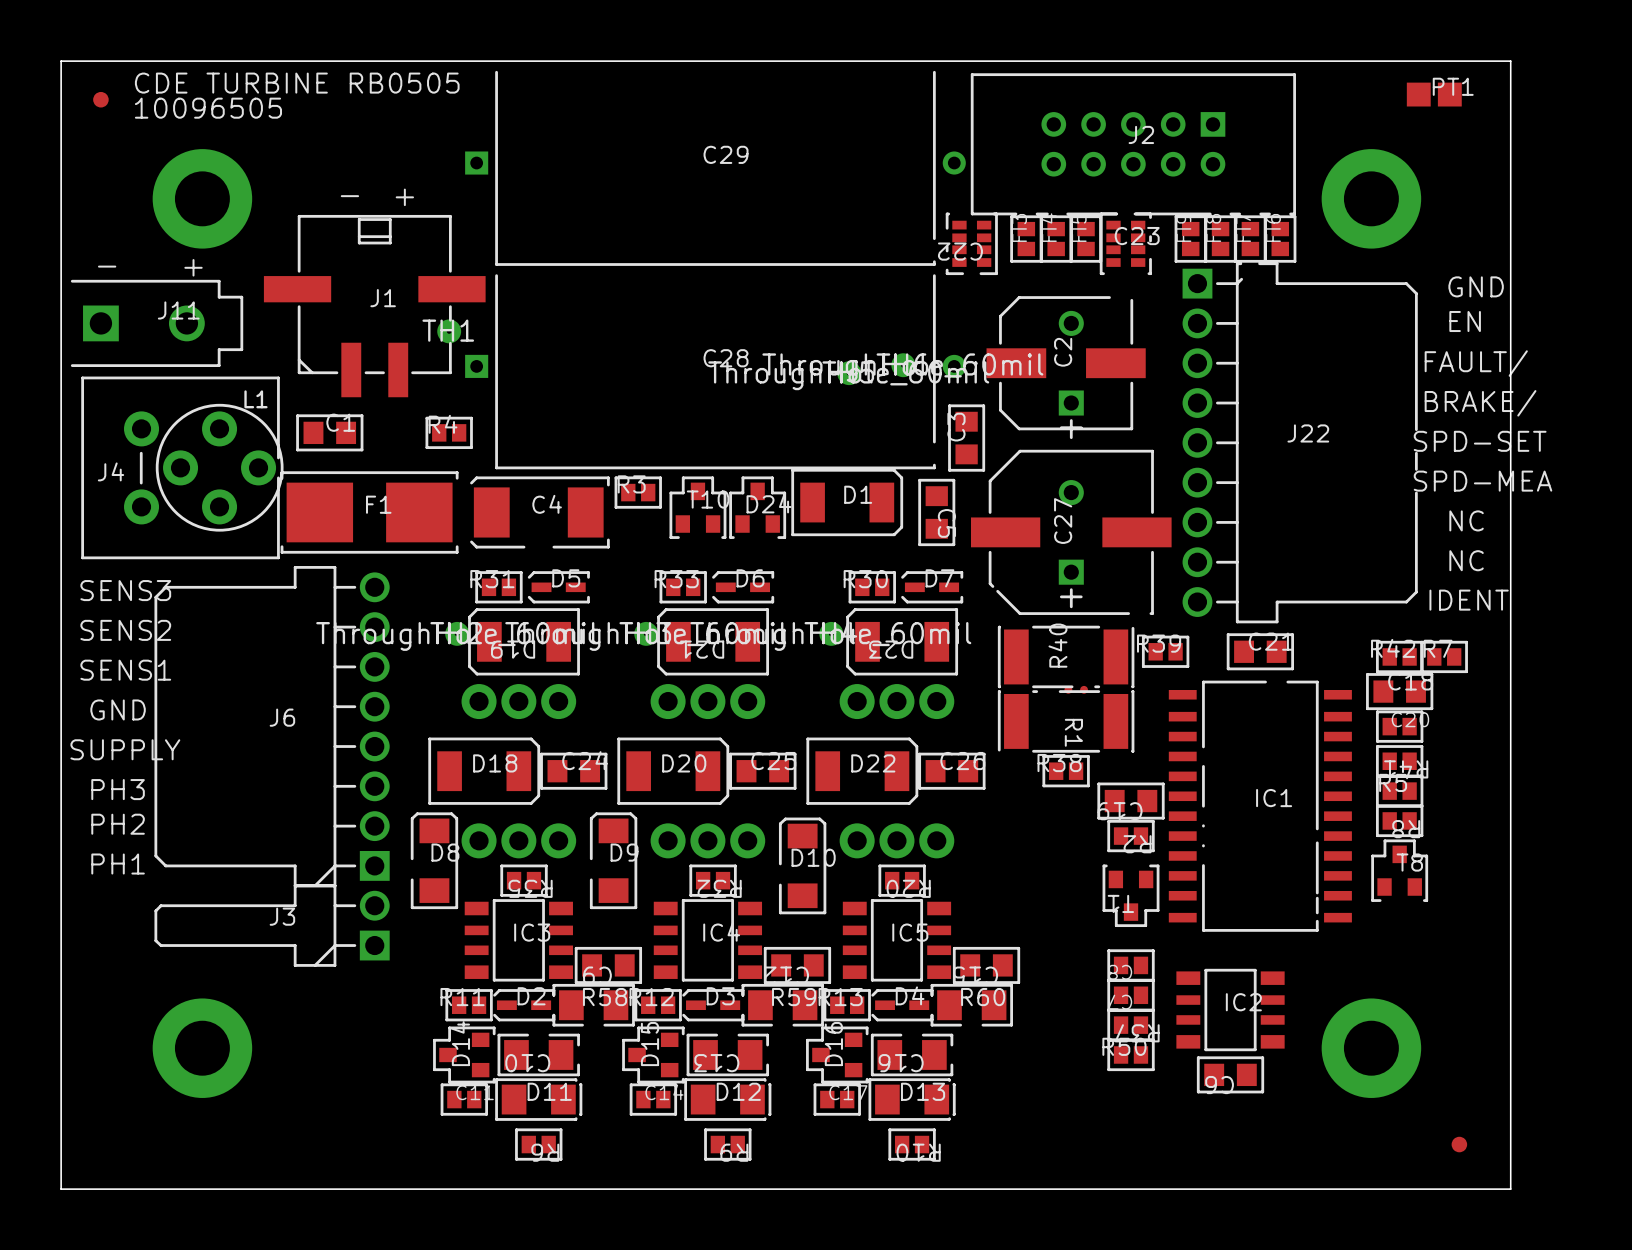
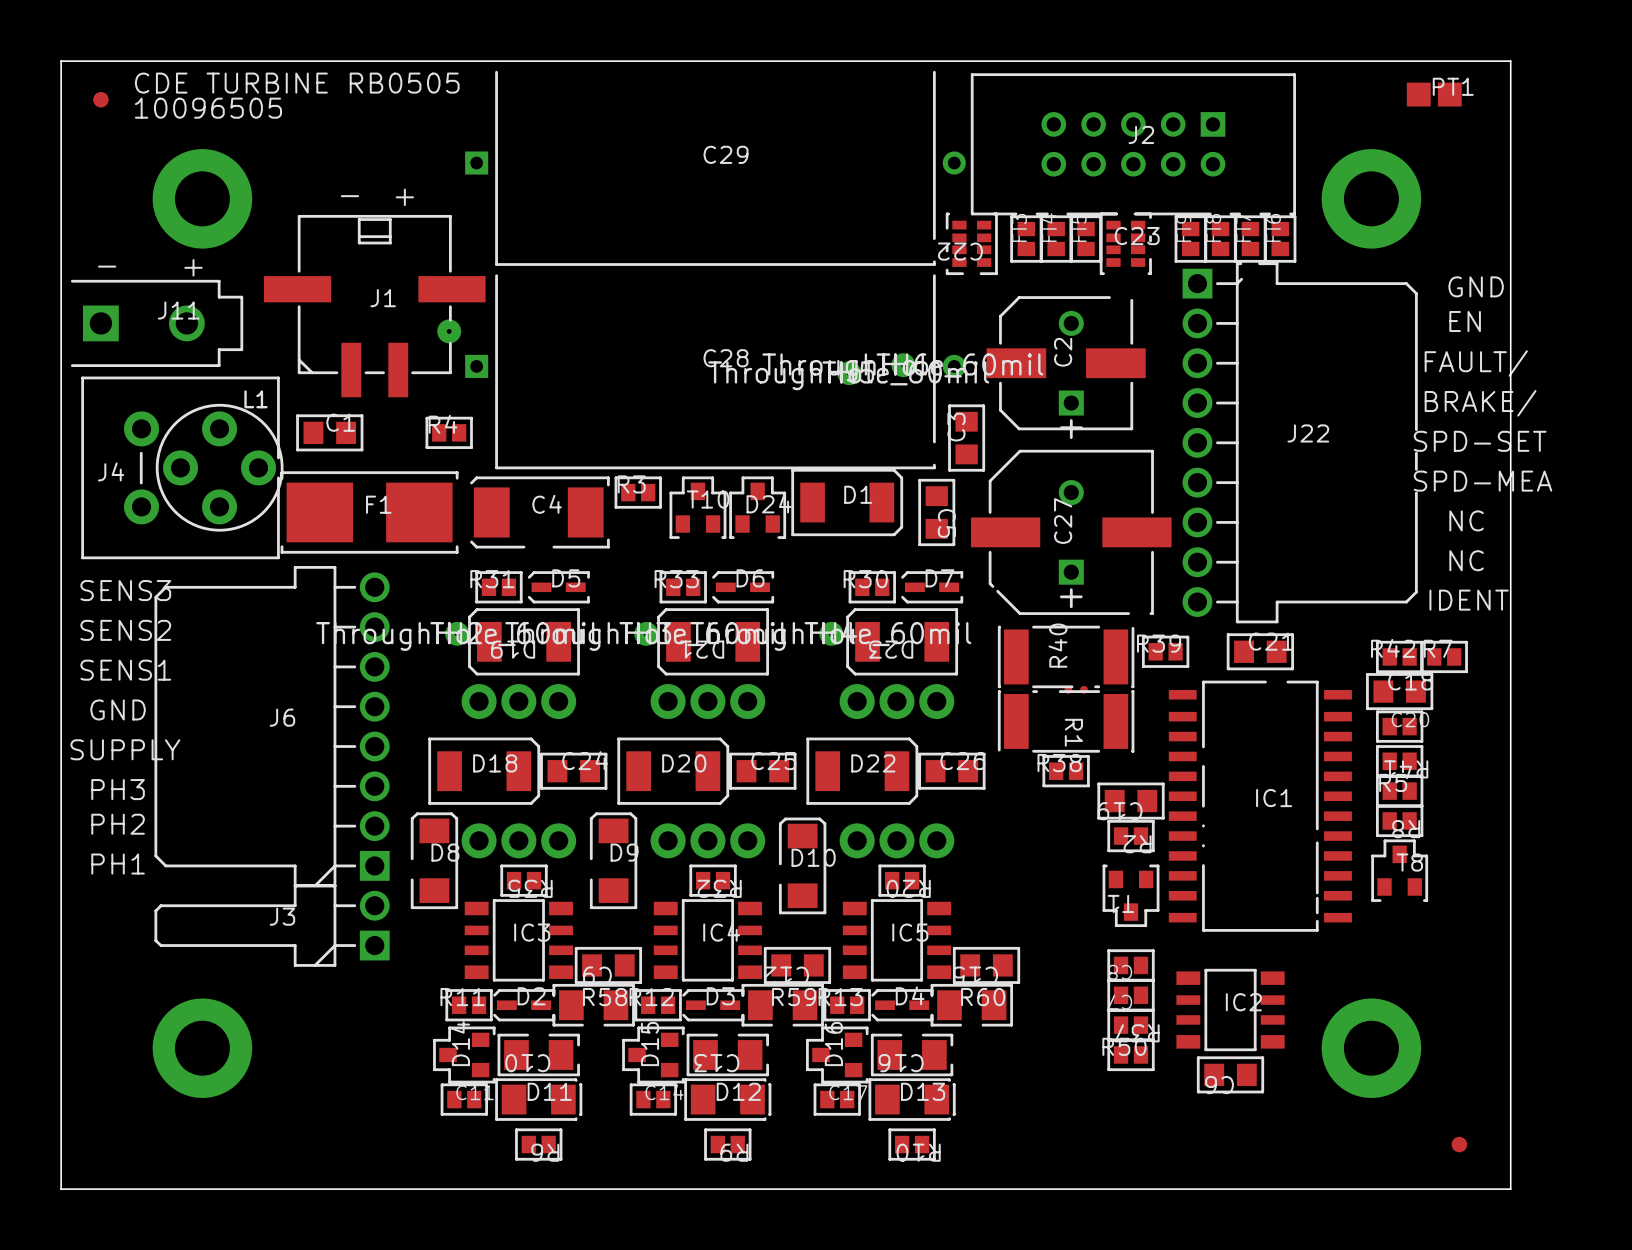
TH1 name: TH1 (448, 330) -> none

